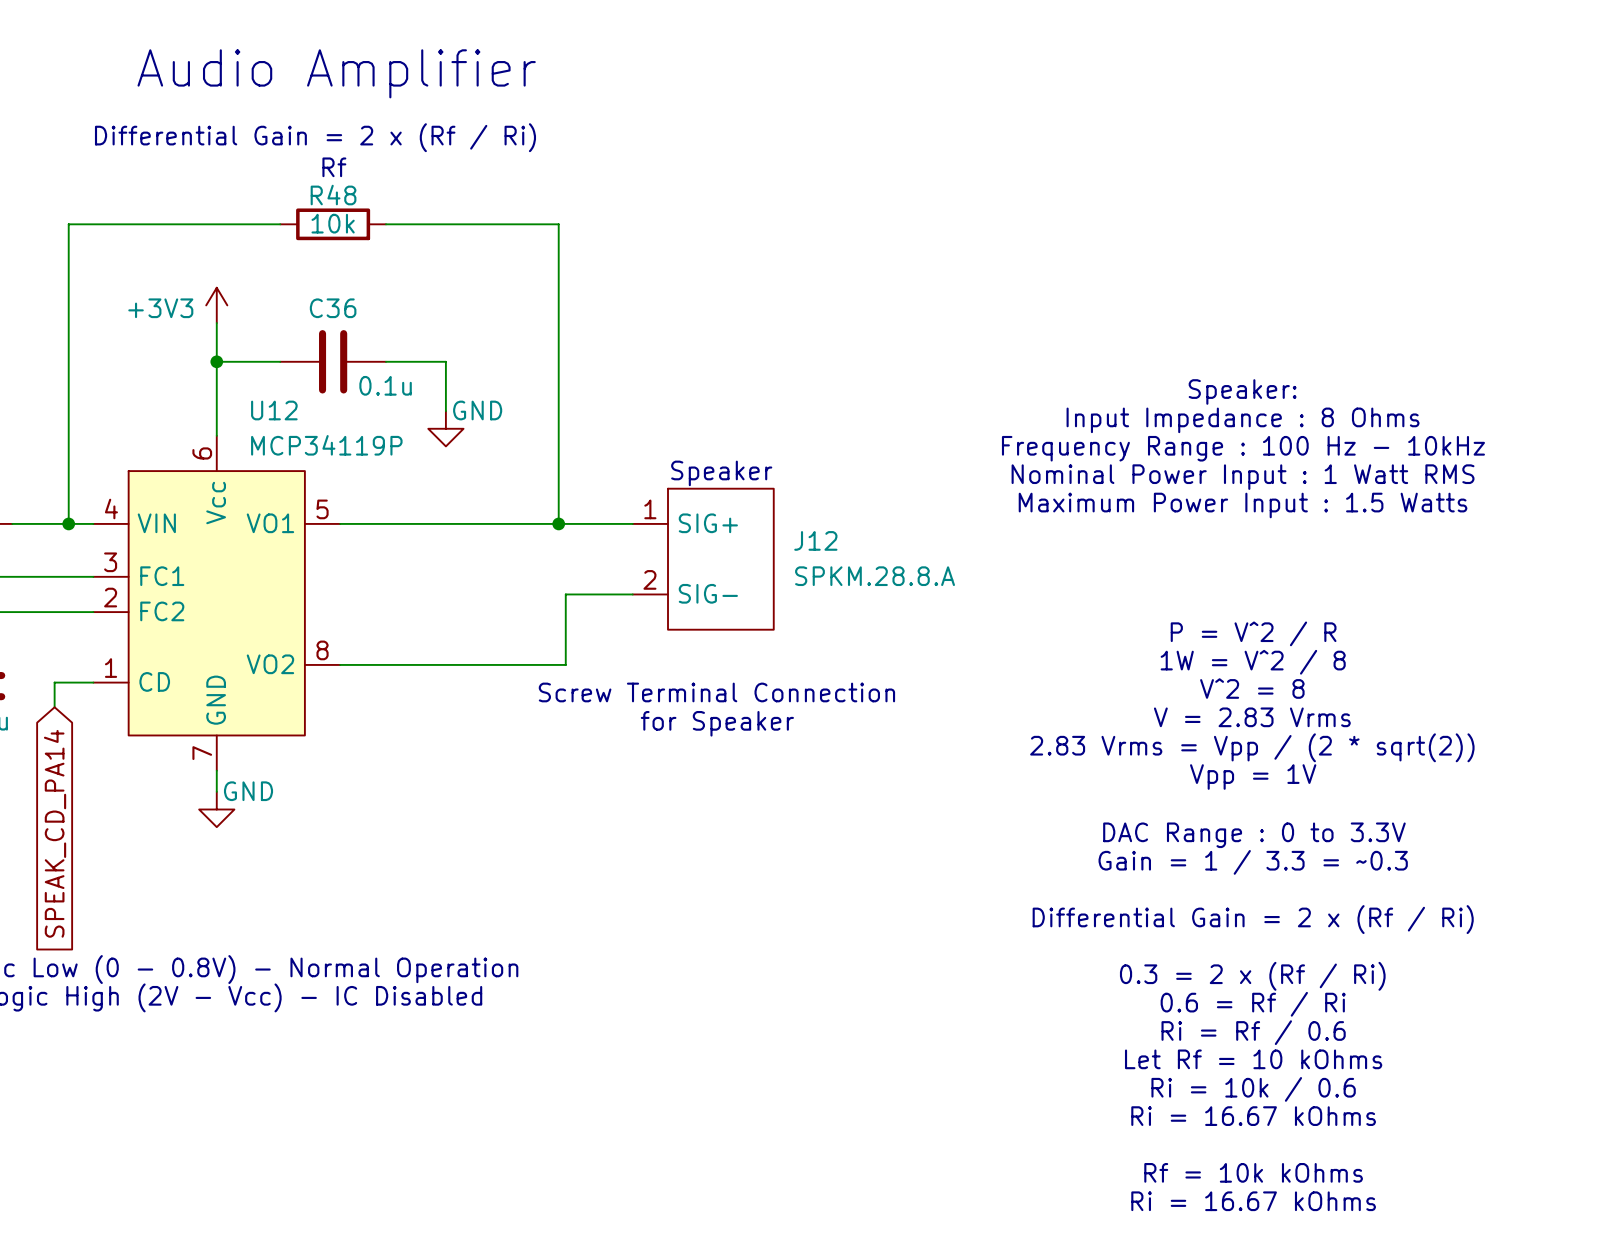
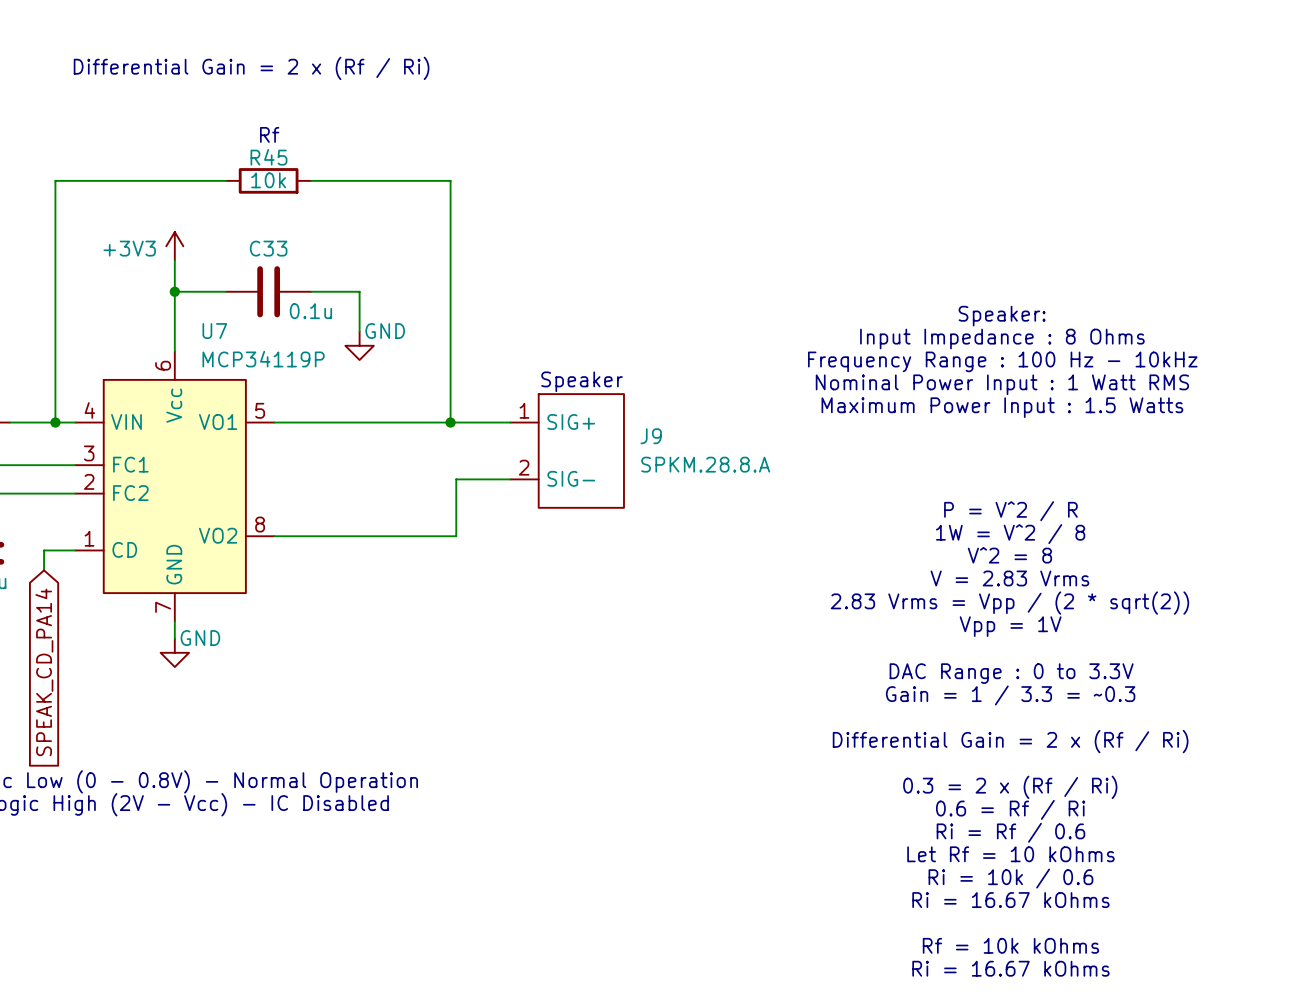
text: Audio Amplifier (336, 73) -> none
text position: Differential Gain = 2 x (Rf / Ri) (315, 137) -> Differential Gain = 2 x (Rf / Ri) (251, 68)
R48 name: R48 (333, 195) -> R45 (268, 157)
C36 name: C36 (333, 308) -> C33 (268, 248)
U12 name: U12 (274, 410) -> U7 (214, 331)
J12 name: J12 (815, 540) -> J9 (651, 436)
text: Screw Terminal Connection (716, 692) -> none
text: for Speaker (717, 723) -> none

